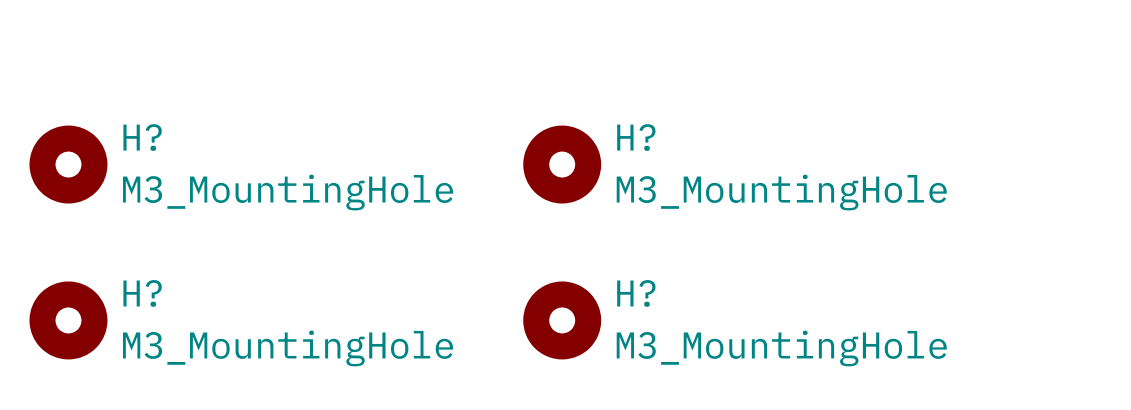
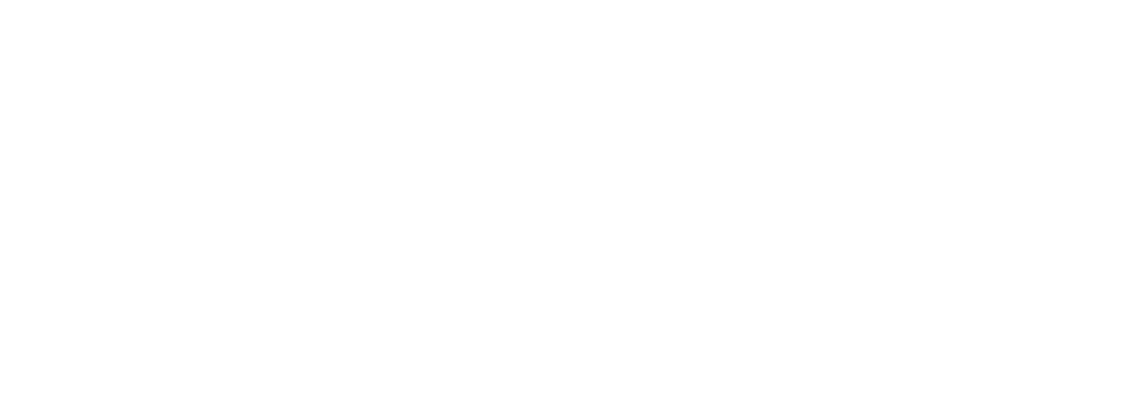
H?: M3_MountingHole (68, 164) -> none
H?: M3_MountingHole (562, 164) -> none
H?: M3_MountingHole (68, 320) -> none
H?: M3_MountingHole (562, 320) -> none

